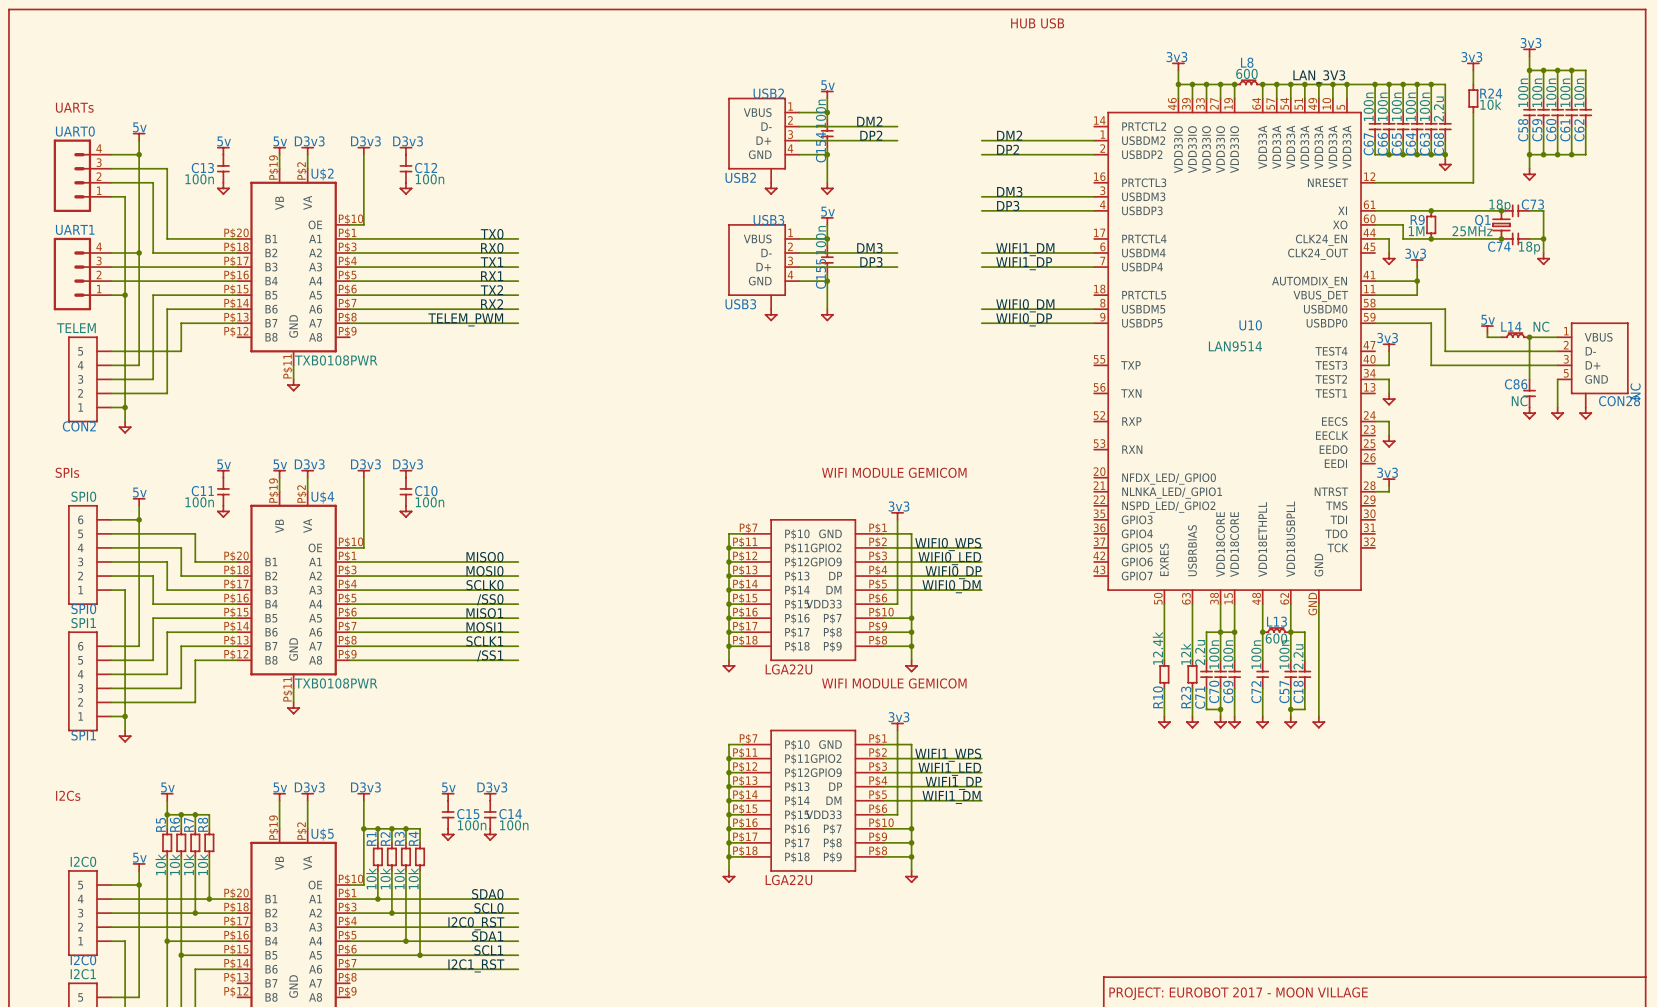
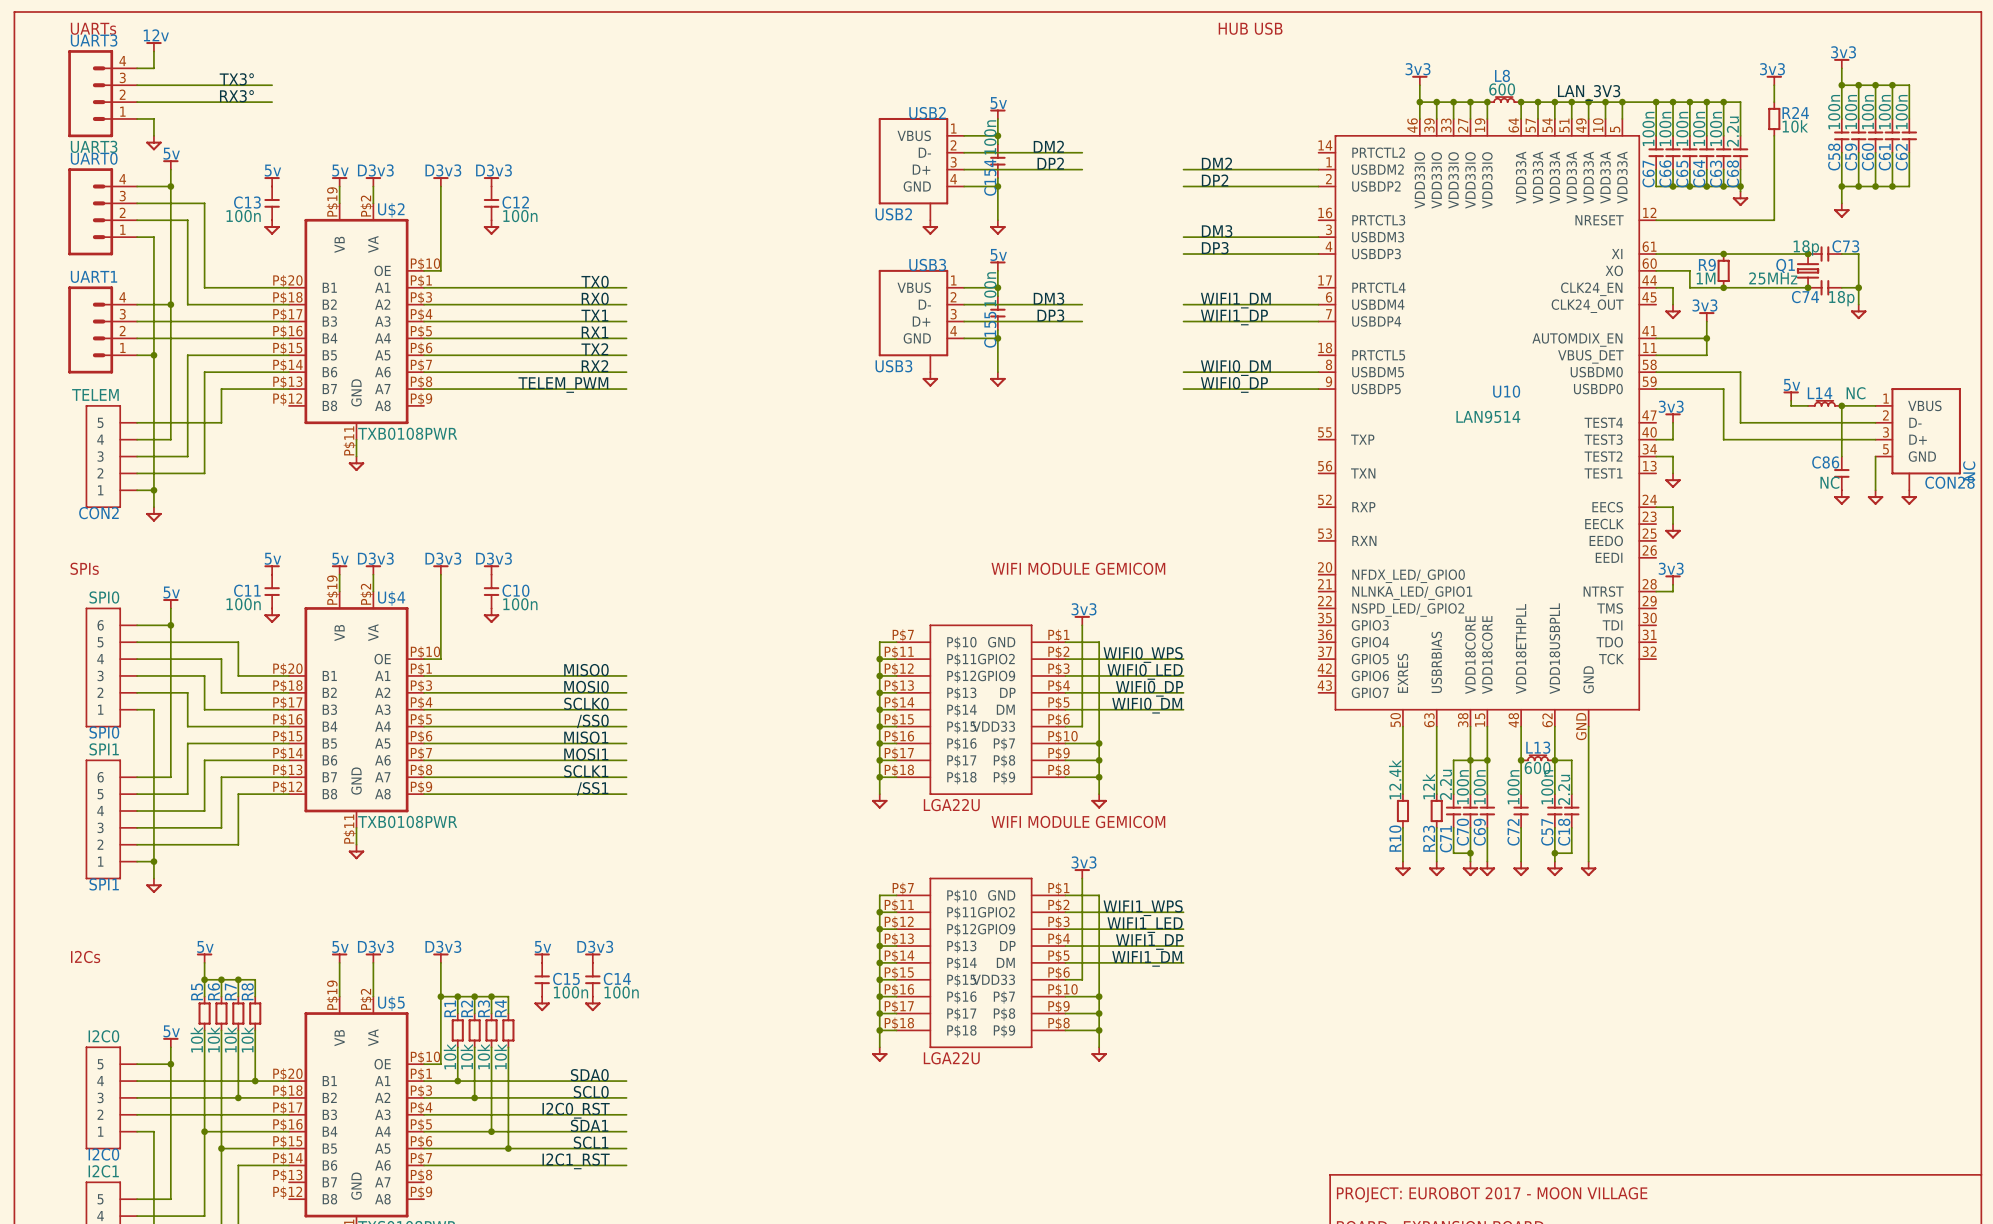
power symbol: none -> (153, 47)
wire: none -> (153, 51) (153, 68) (137, 68)
label: none -> TX3° (236, 79)
wire: none -> (137, 85) (272, 85)
UART3: none -> UART3 (102, 93)
label: none -> RX3° (236, 96)
wire: none -> (137, 102) (272, 102)
wire: none -> (137, 118) (153, 118) (153, 135)
text position: UARTs (74, 107) -> UARTs (93, 28)
power symbol: none -> (153, 142)

